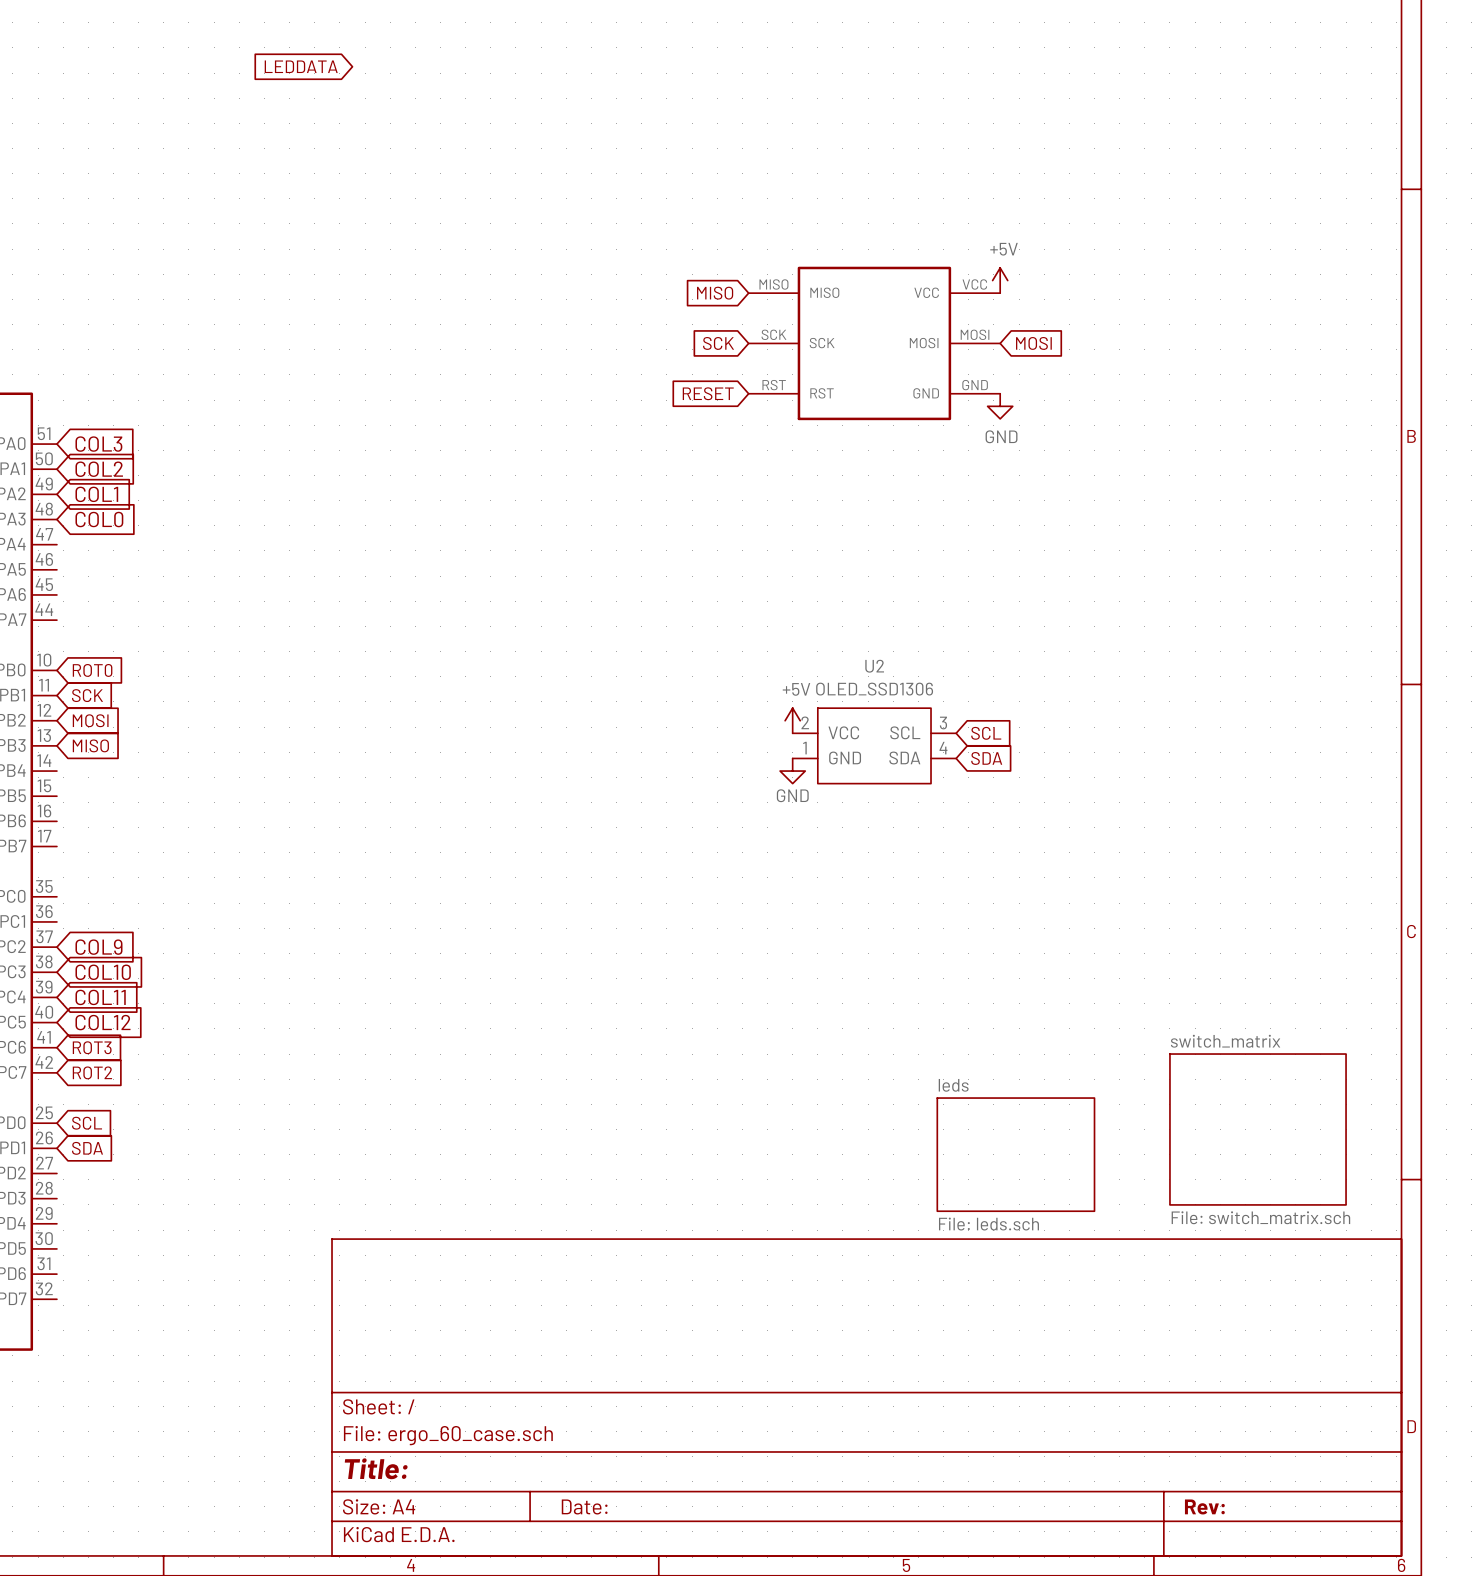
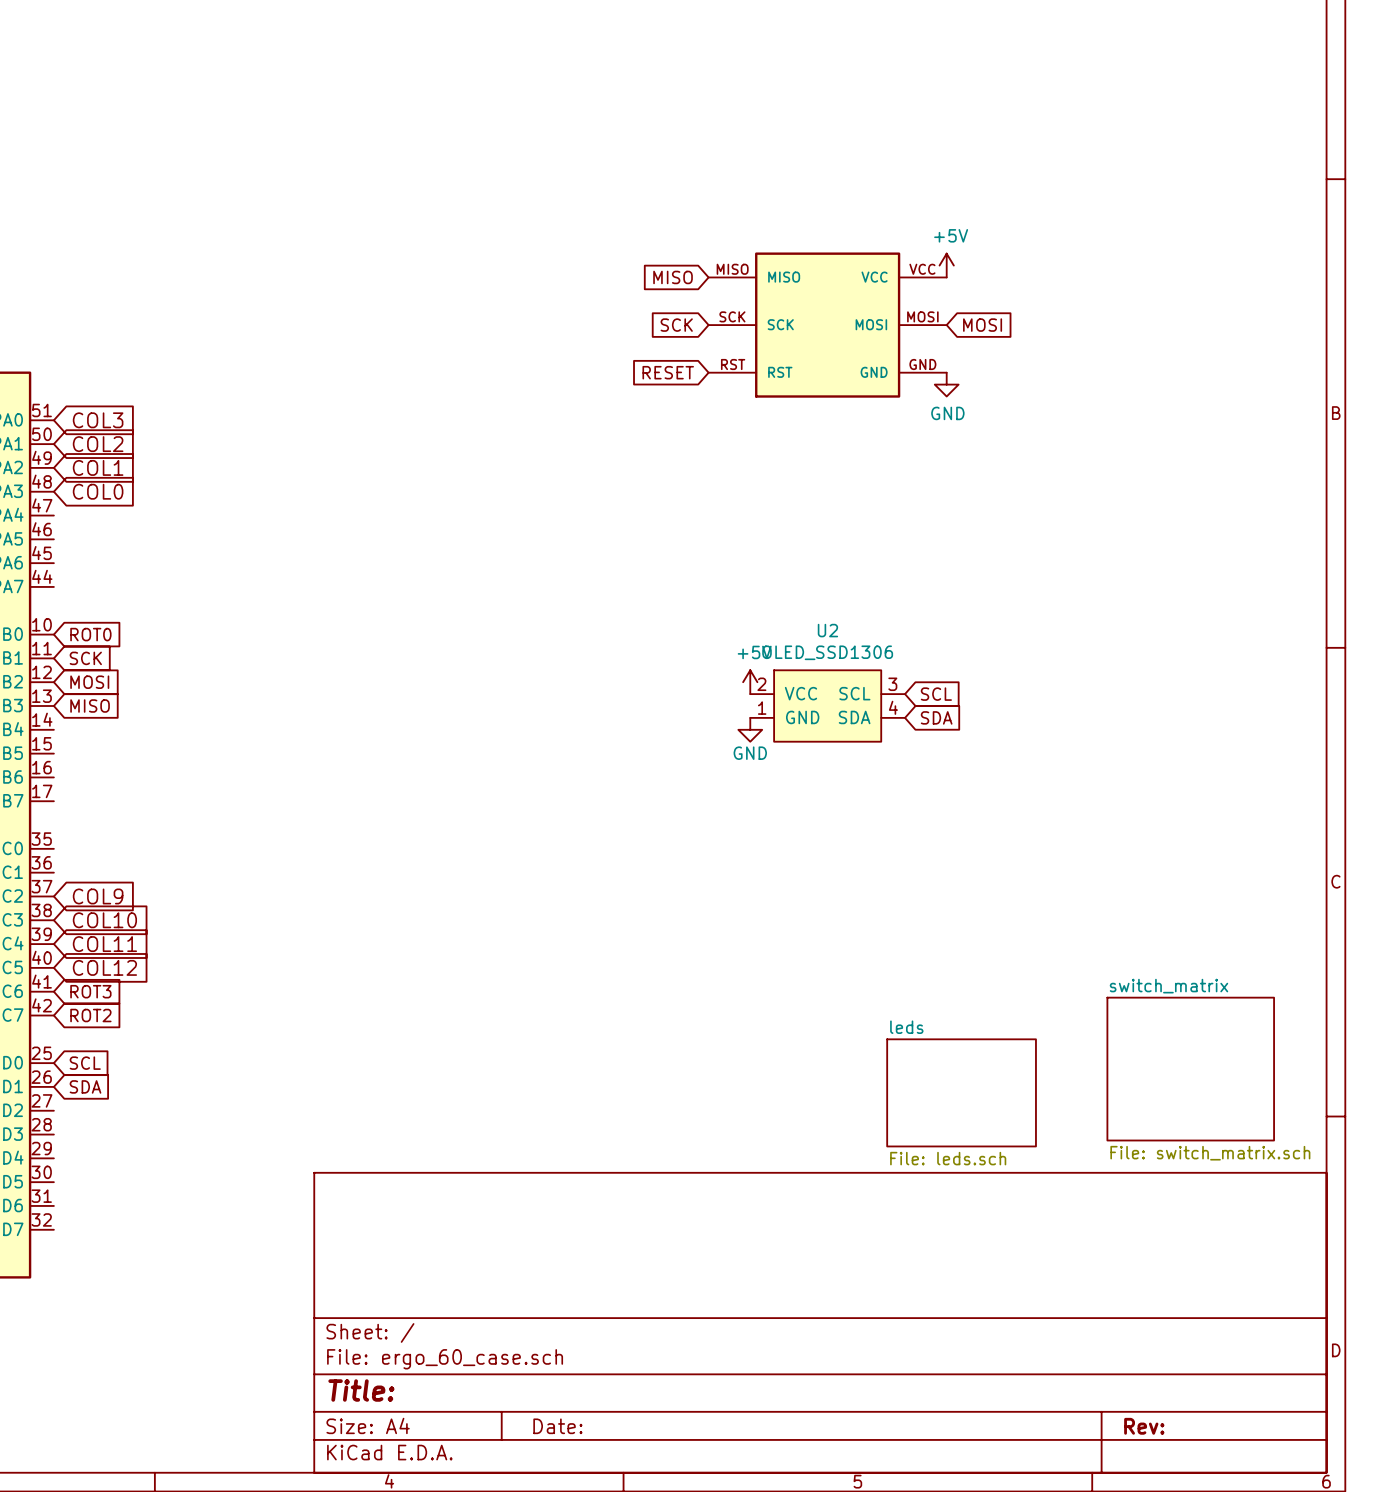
global label: LEDDATA (301, 66) -> none

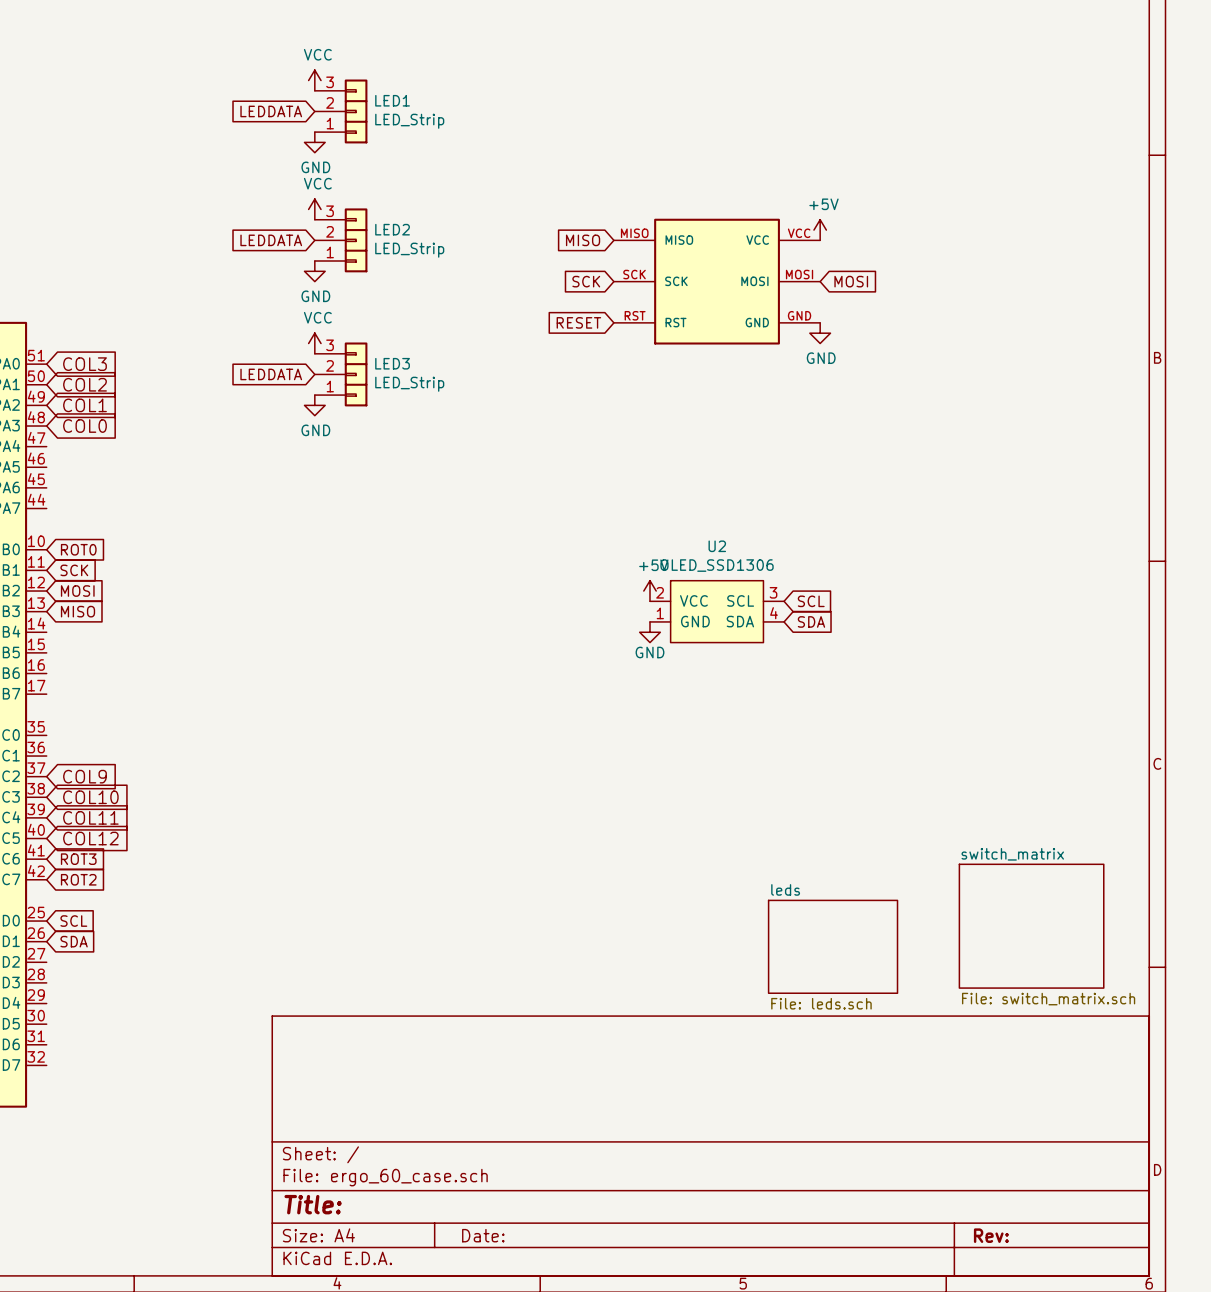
power symbol: none -> VCC (314, 80)
global label: none -> LEDDATA (271, 111)
LED1: none -> LED_Strip (341, 111)
power symbol: none -> GND (314, 142)
power symbol: none -> VCC (314, 209)
global label: none -> LEDDATA (271, 240)
LED2: none -> LED_Strip (341, 240)
power symbol: none -> GND (314, 271)
power symbol: none -> VCC (314, 343)
global label: none -> LEDDATA (271, 374)
LED3: none -> LED_Strip (341, 374)
power symbol: none -> GND (314, 405)

